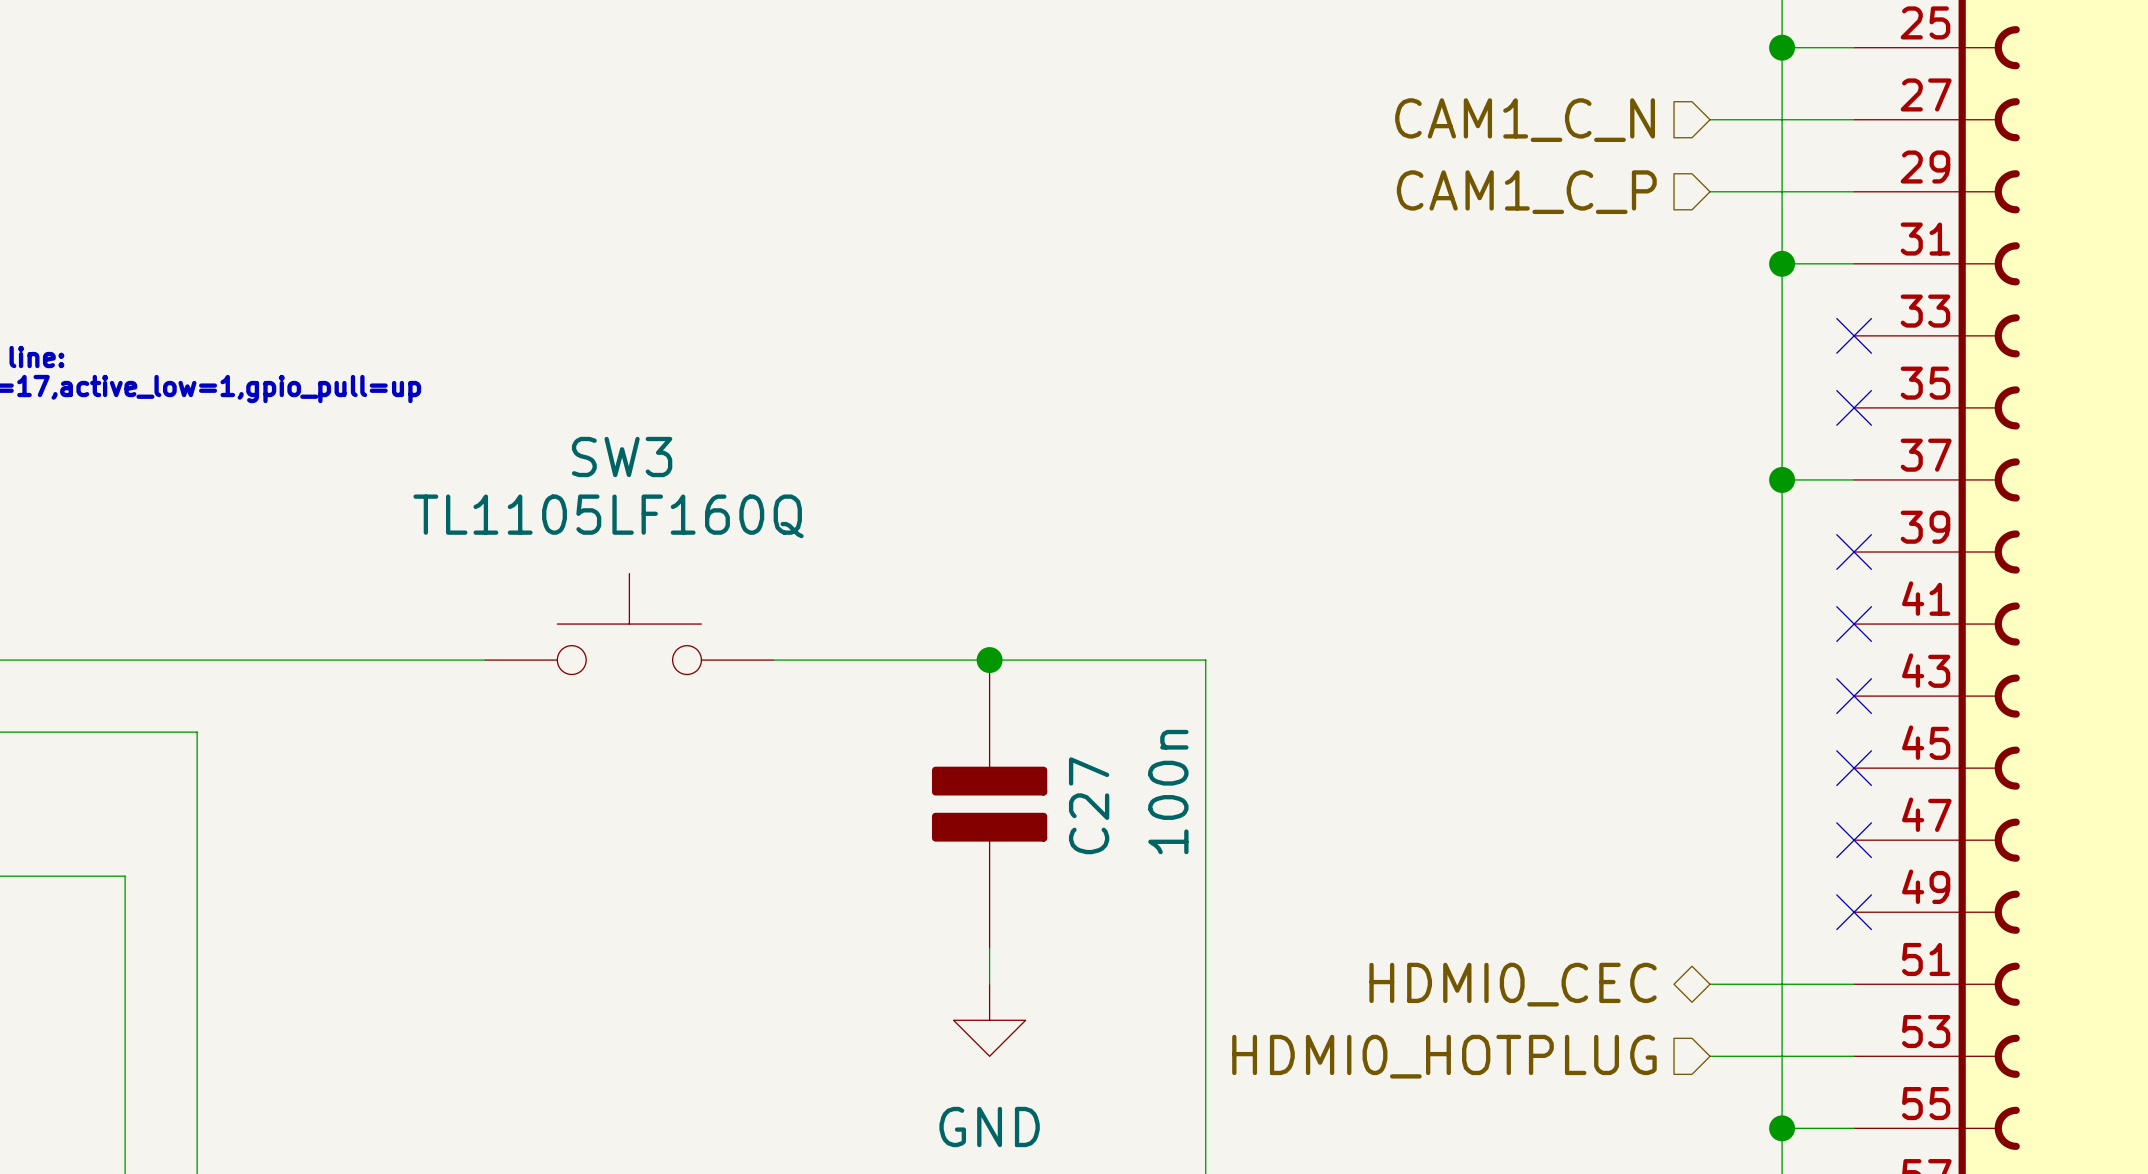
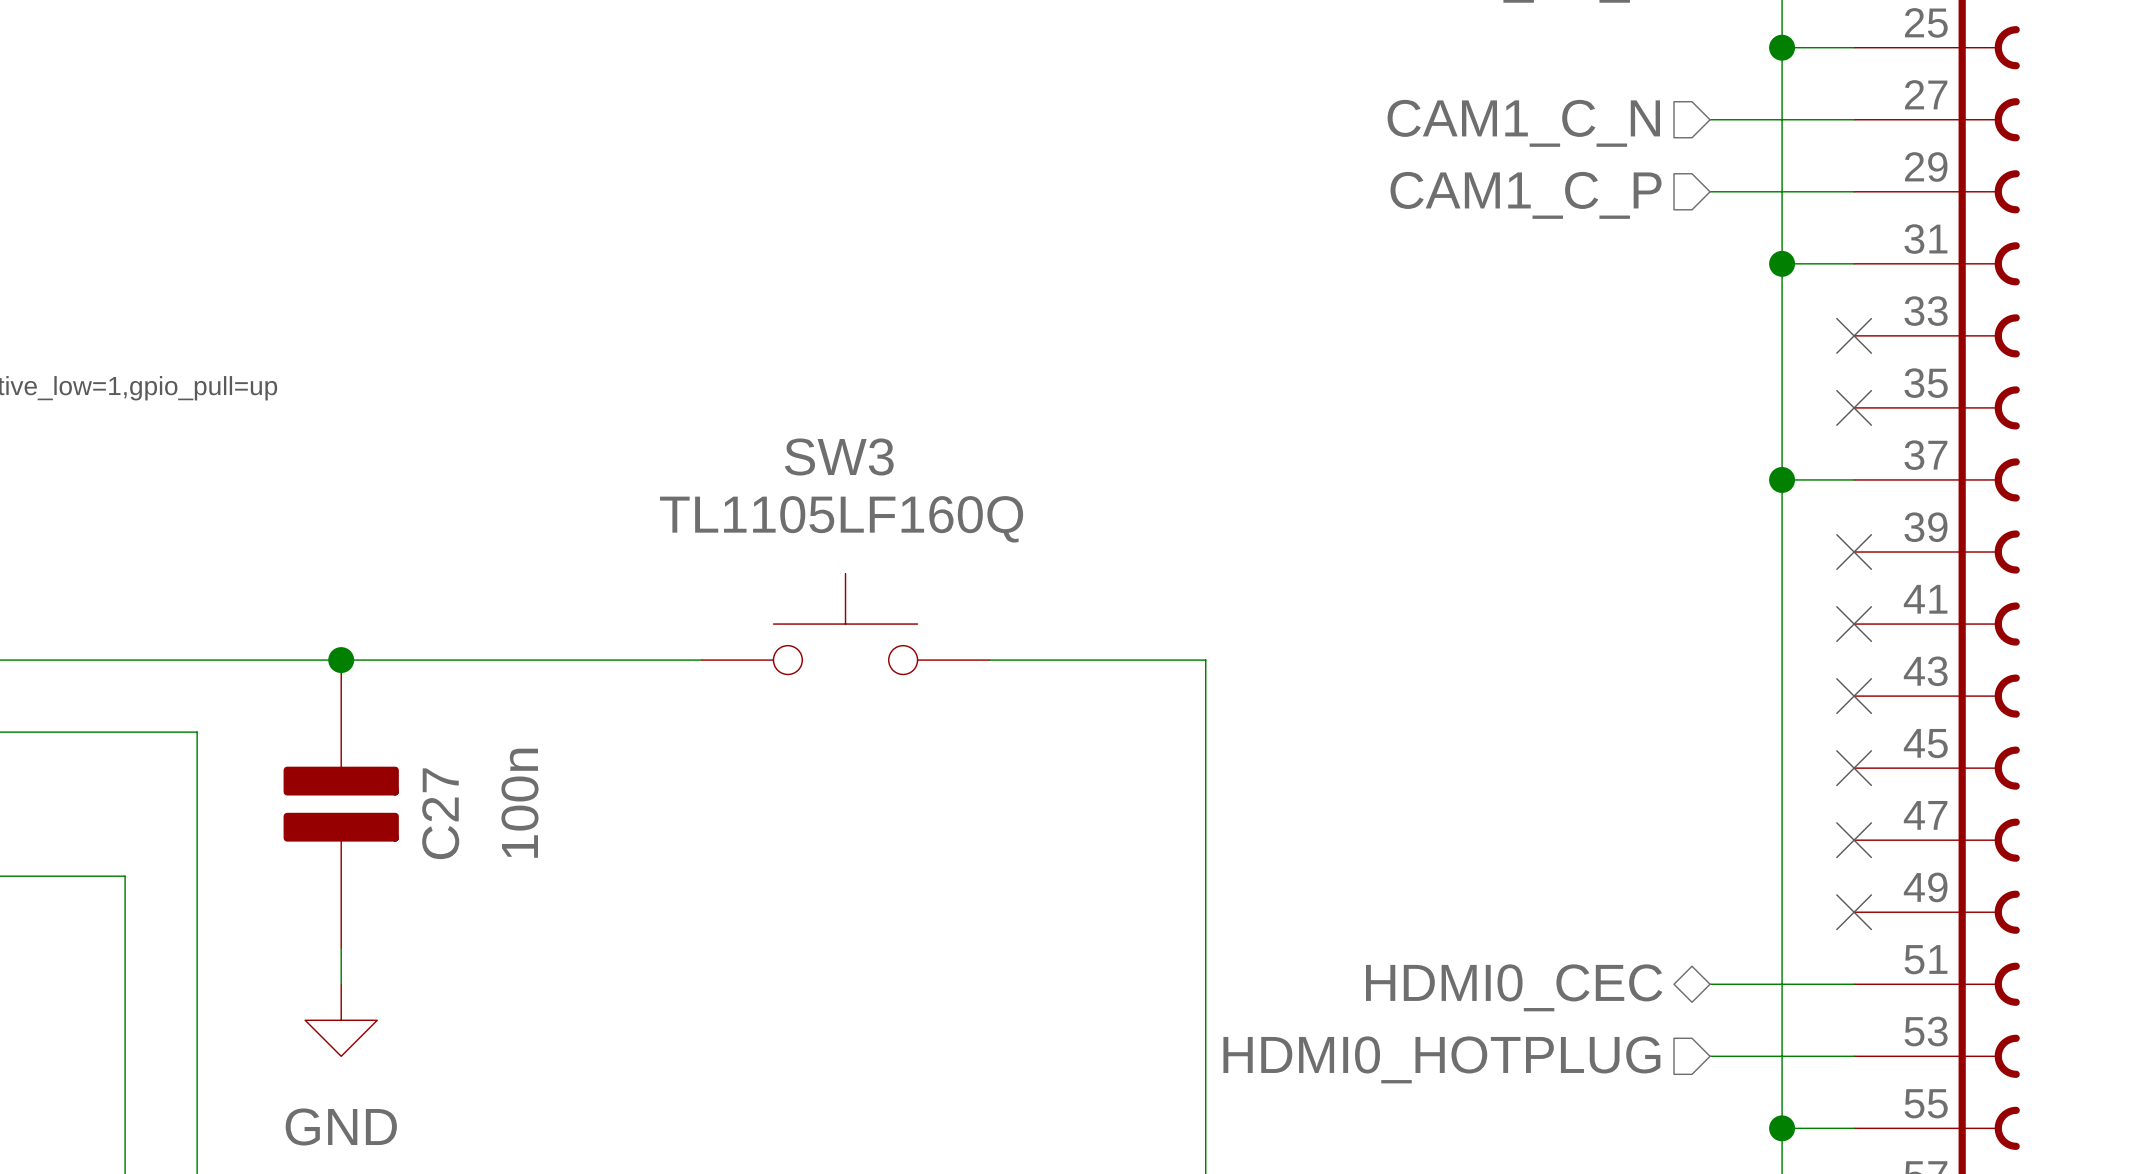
SW3 position: (629, 624) -> (845, 624)
junction: none -> (341, 660)
wire: (773, 660) (989, 660) -> (485, 660) (701, 660)
junction: (989, 660) -> none
C27 position: (989, 804) -> (341, 804)
wire: (989, 948) (989, 984) -> (341, 948) (341, 984)
power symbol position: GND (989, 1020) -> GND (341, 1020)

